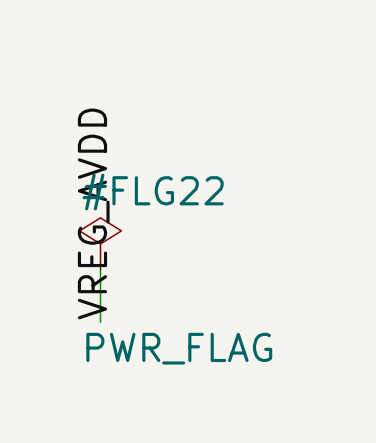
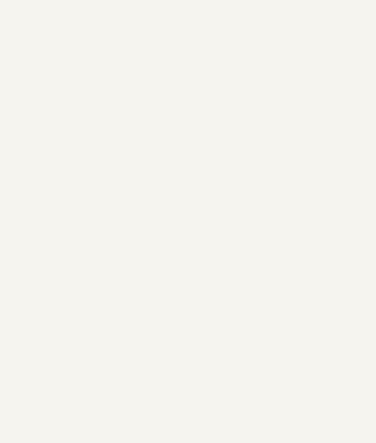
label: VREG_AVDD (93, 213) -> none
#FLG22: PWR_FLAG (100, 243) -> none
wire: (100, 270) (100, 322) -> none

